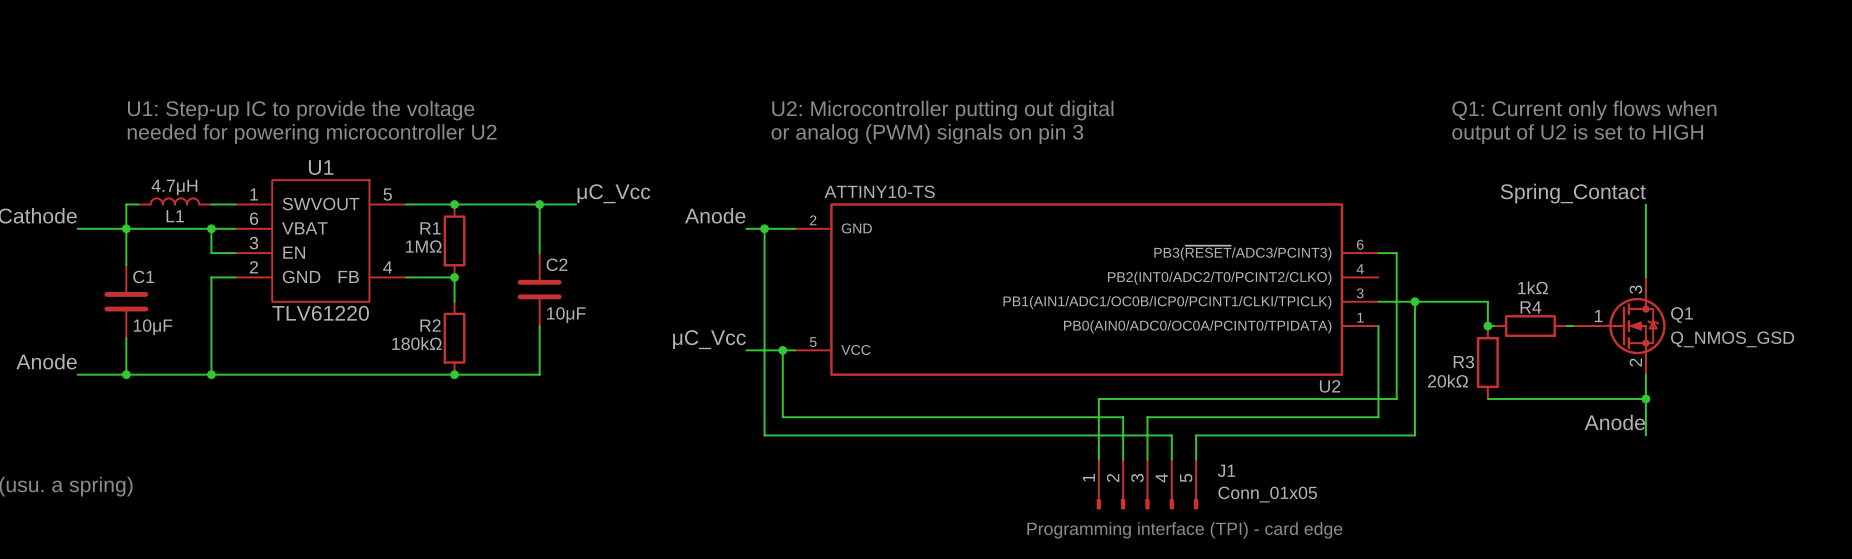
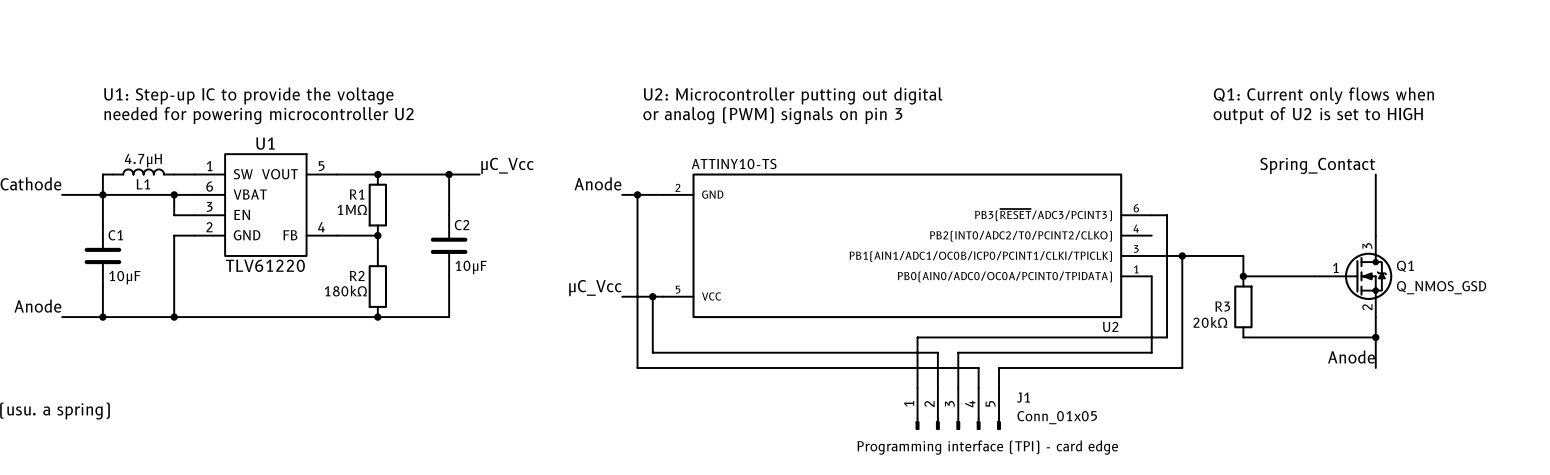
wire: none -> (1248, 276) (1309, 276)
R4: 1kΩ (1530, 326) -> none

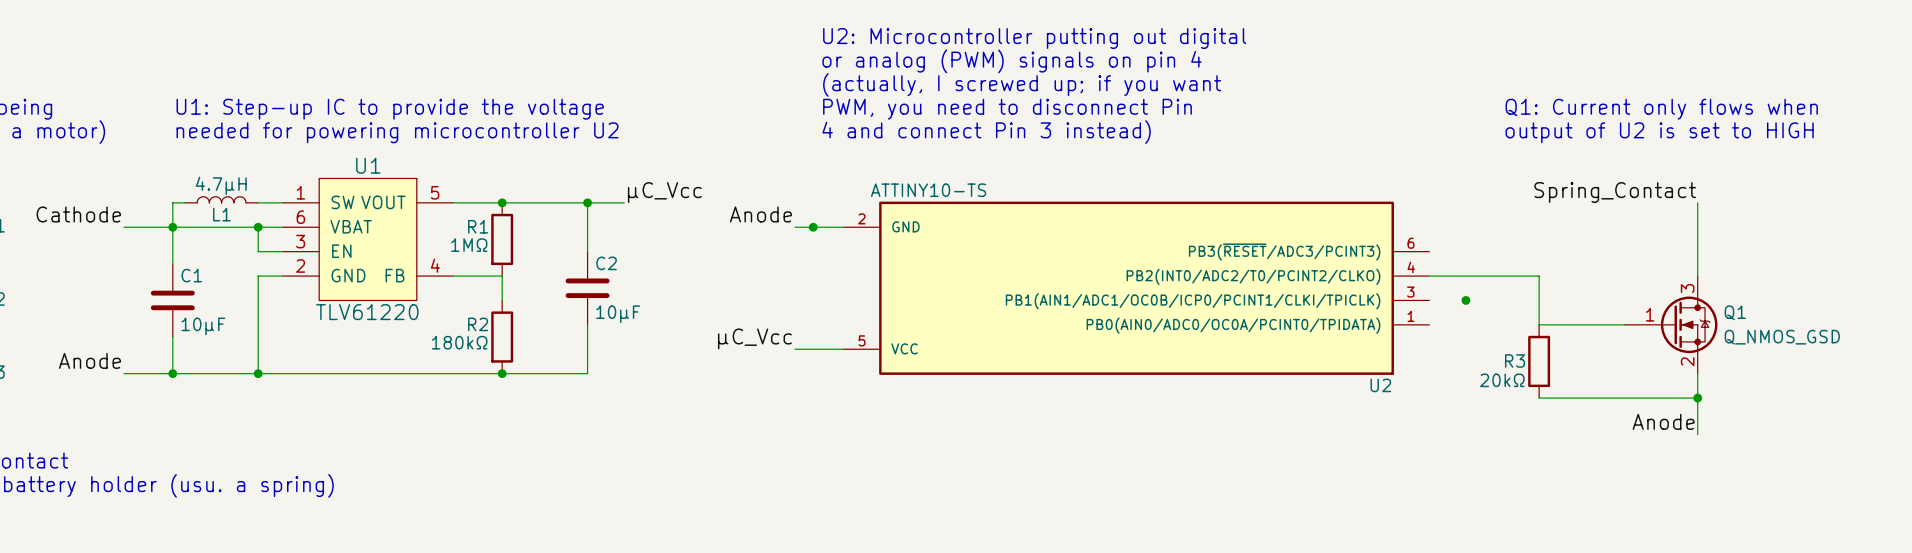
text: none -> U2: Microcontroller putting out digital (1034, 38)
text: none -> or analog (PWM) signals on pin 4 (1012, 61)
text: none -> (actually, I screwed up; if you want (1022, 84)
text: U2: Microcontroller putting out digital (793, 96) -> PWM, you need to disconnect Pin (1007, 109)
text: or analog (PWM) signals on pin 3 (772, 115) -> 4 and connect Pin 3 instead) (986, 132)
wire: (637, 194) (637, 368) (978, 368) (978, 388) -> none
wire: (1151, 215) (1167, 215) (1167, 337) (917, 337) (917, 388) -> none
junction: (377, 235) -> none
wire: (1151, 255) (1243, 255) -> (1429, 276) (1539, 276) (1539, 300)
wire: (1182, 255) (1182, 368) (999, 368) (999, 388) -> none
wire: (1151, 276) (1151, 352) (958, 352) (958, 388) -> none
junction: (1243, 276) -> none
wire: (652, 296) (652, 352) (937, 352) (937, 388) -> none
junction: (652, 296) -> none
J1: Conn_01x05 (958, 409) -> none
text: Programming interface (TPI) - card edge (987, 447) -> none

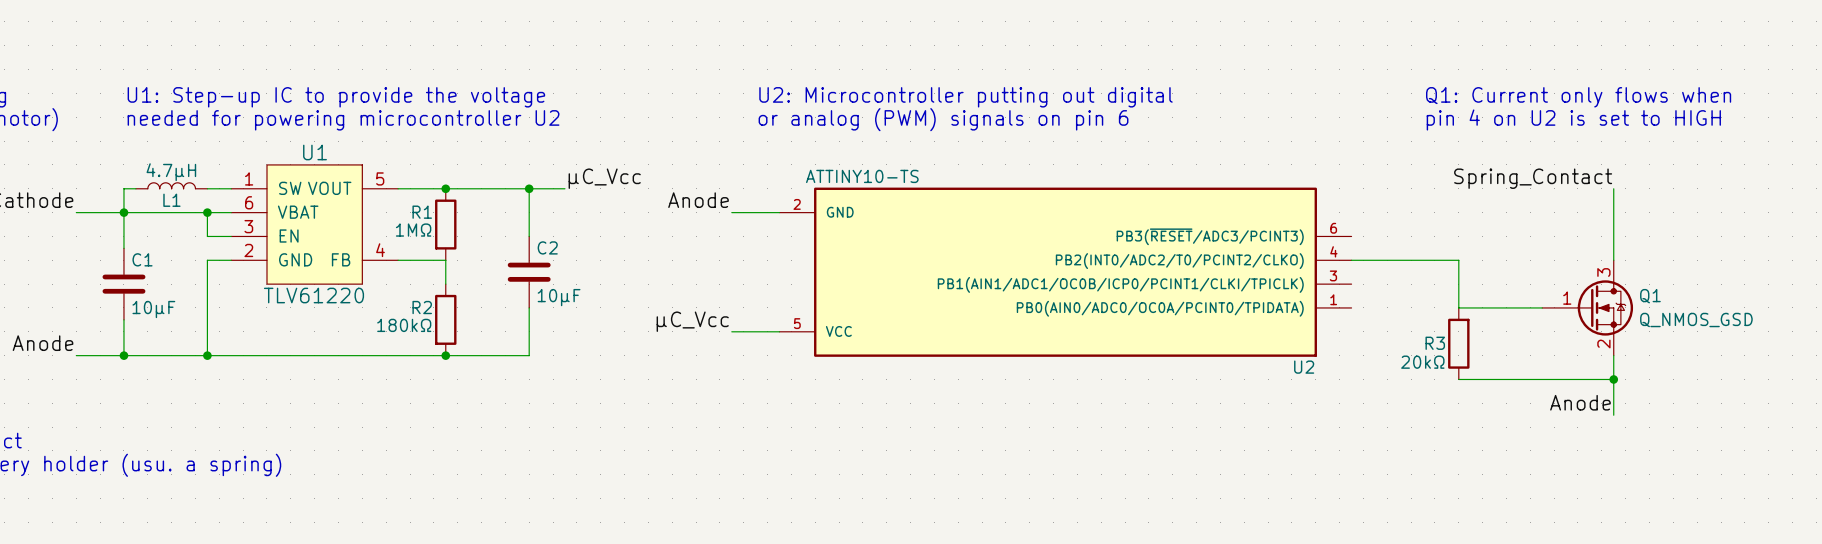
text: U2: Microcontroller putting out digital (1034, 38) -> none
text: or analog (PWM) signals on pin 4 (1012, 61) -> none
text: (actually, I screwed up; if you want (1022, 84) -> none
text: PWM, you need to disconnect Pin (1007, 109) -> U2: Microcontroller putting out digital (965, 97)
text: 4 and connect Pin 3 instead) (986, 132) -> or analog (PWM) signals on pin 6 (943, 119)
text: output of U2 is set to HIGH (1659, 132) -> pin 4 on U2 is set to HIGH (1573, 119)
junction: (813, 227) -> none
junction: (1465, 300) -> none

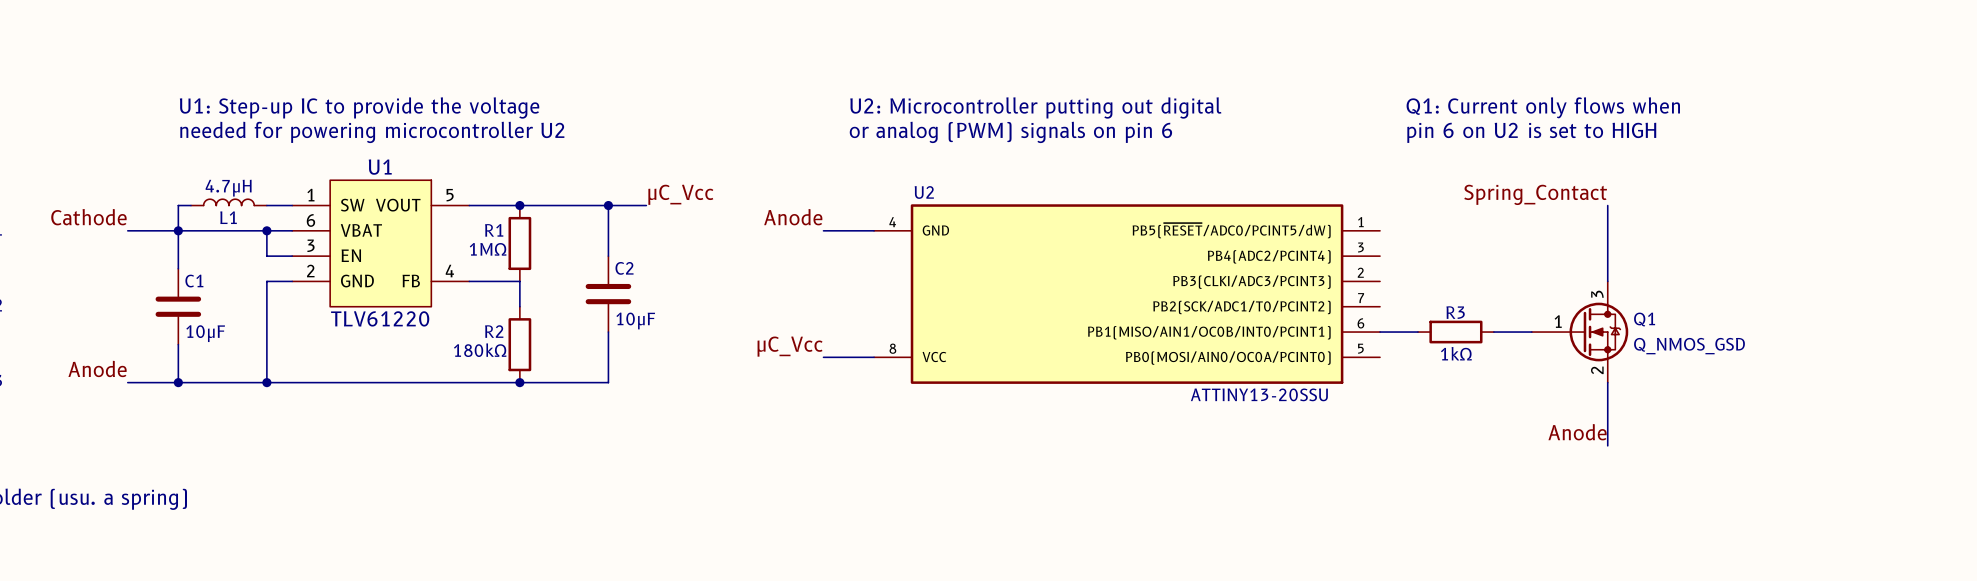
text position: Q1: Current only flows when (1578, 97) -> Q1: Current only flows when (1543, 107)
text: pin 4 on U2 is set to HIGH (1573, 119) -> pin 6 on U2 is set to HIGH (1531, 132)
U2 value: ATTINY10-TS (862, 176) -> ATTINY13-20SSU (1259, 394)
label position: Spring_Contact (1533, 178) -> Spring_Contact (1535, 194)
U2 symbol: [779, 187, 1352, 357] -> [874, 204, 1381, 384]
wire: (1613, 188) (1613, 260) -> (1607, 205) (1607, 281)
wire: (1351, 260) (1458, 260) (1458, 307) (1542, 307) -> none
wire: none -> (1493, 332) (1531, 332)
Q1 position: (1587, 307) -> (1580, 332)
R3 rotation: 0° (1458, 343) -> 90° clockwise (1455, 332)
R3 position: (1458, 343) -> (1455, 332)
wire: (1613, 355) (1613, 415) -> (1607, 382) (1607, 445)
R3 value: 20kΩ (1422, 362) -> 1kΩ (1456, 353)
U2 name position: U2 (1304, 367) -> U2 (924, 192)
wire: (1458, 379) (1613, 379) -> none
junction: (1613, 379) -> none
label position: Anode (1580, 402) -> Anode (1577, 432)

